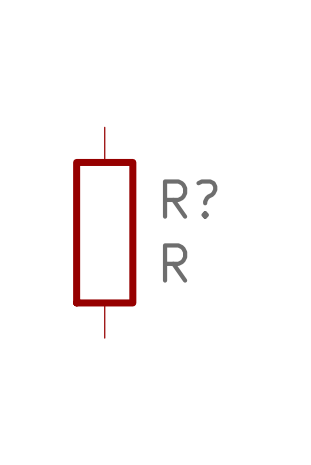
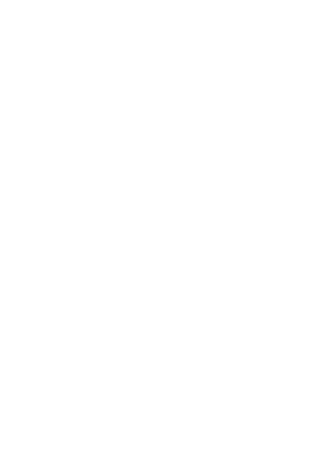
R?: R (104, 232) -> none

